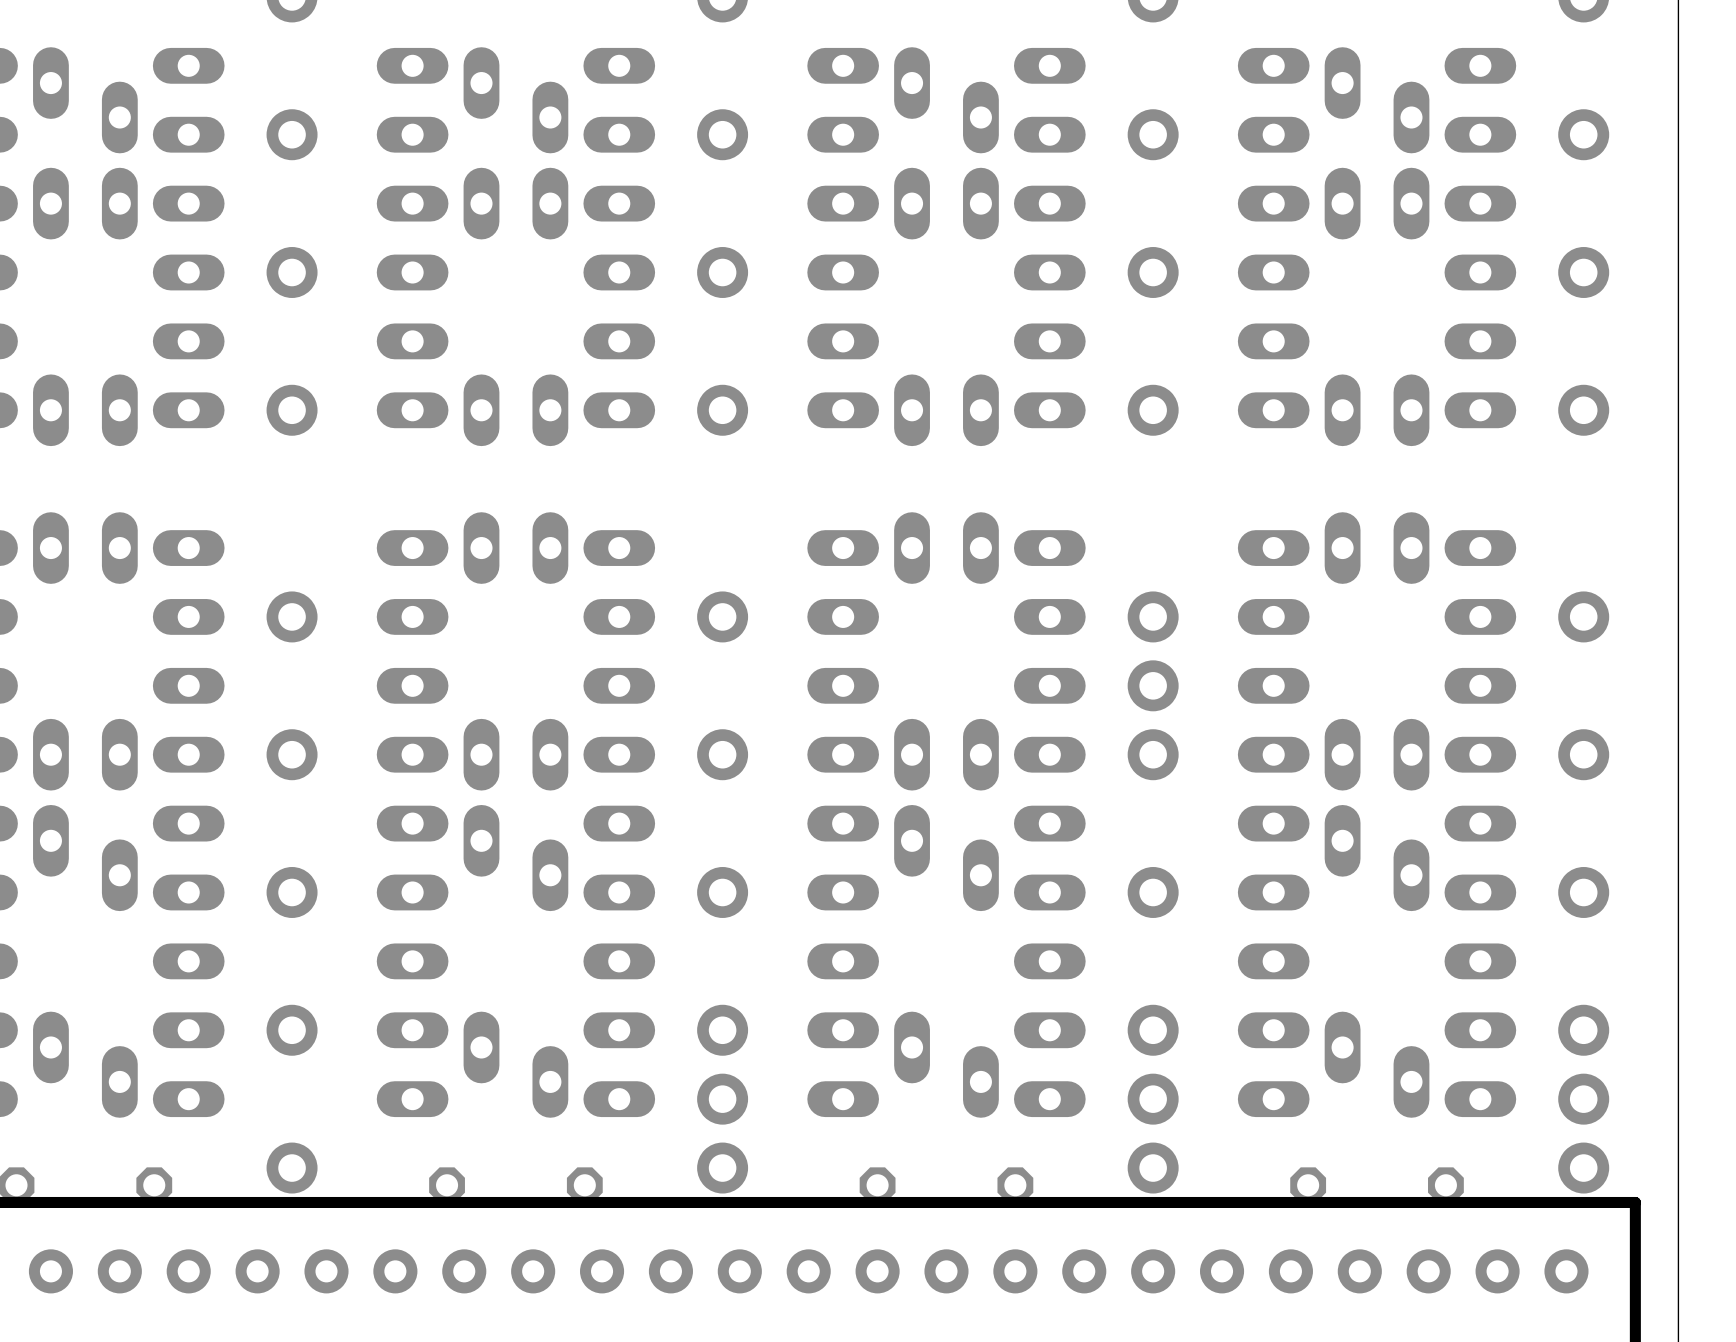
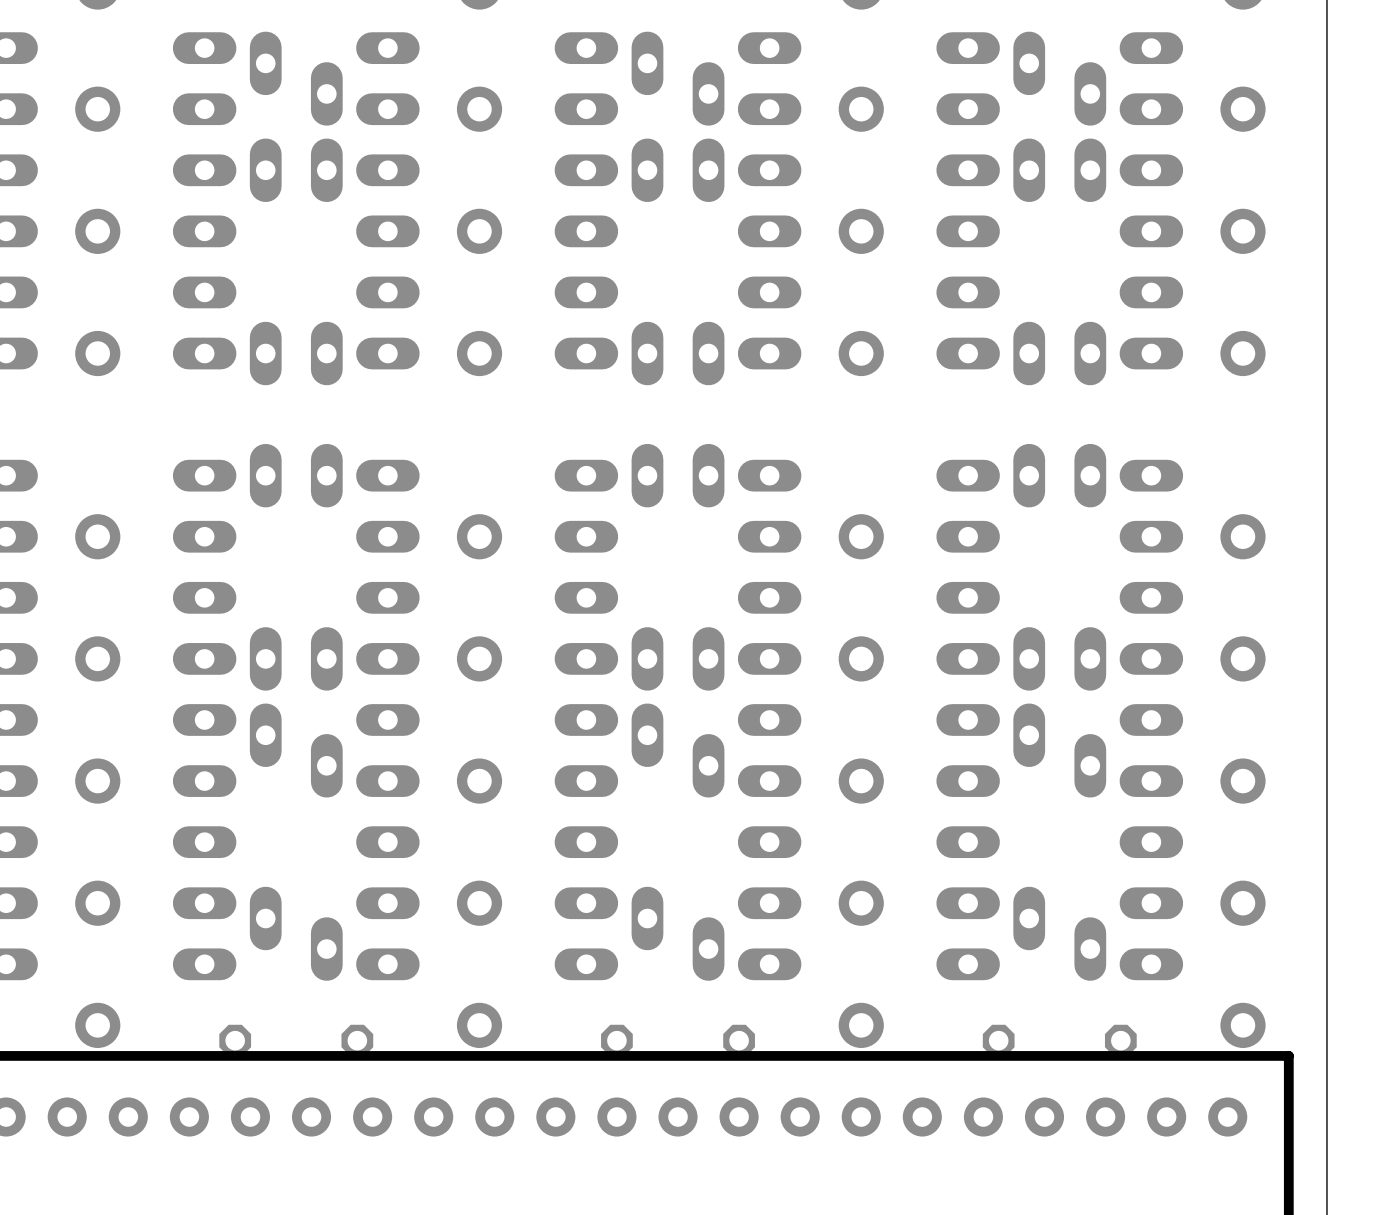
part: (1153, 685) -> none
part: (722, 1099) -> none
part: (1153, 1099) -> none
part: (1583, 1099) -> none

